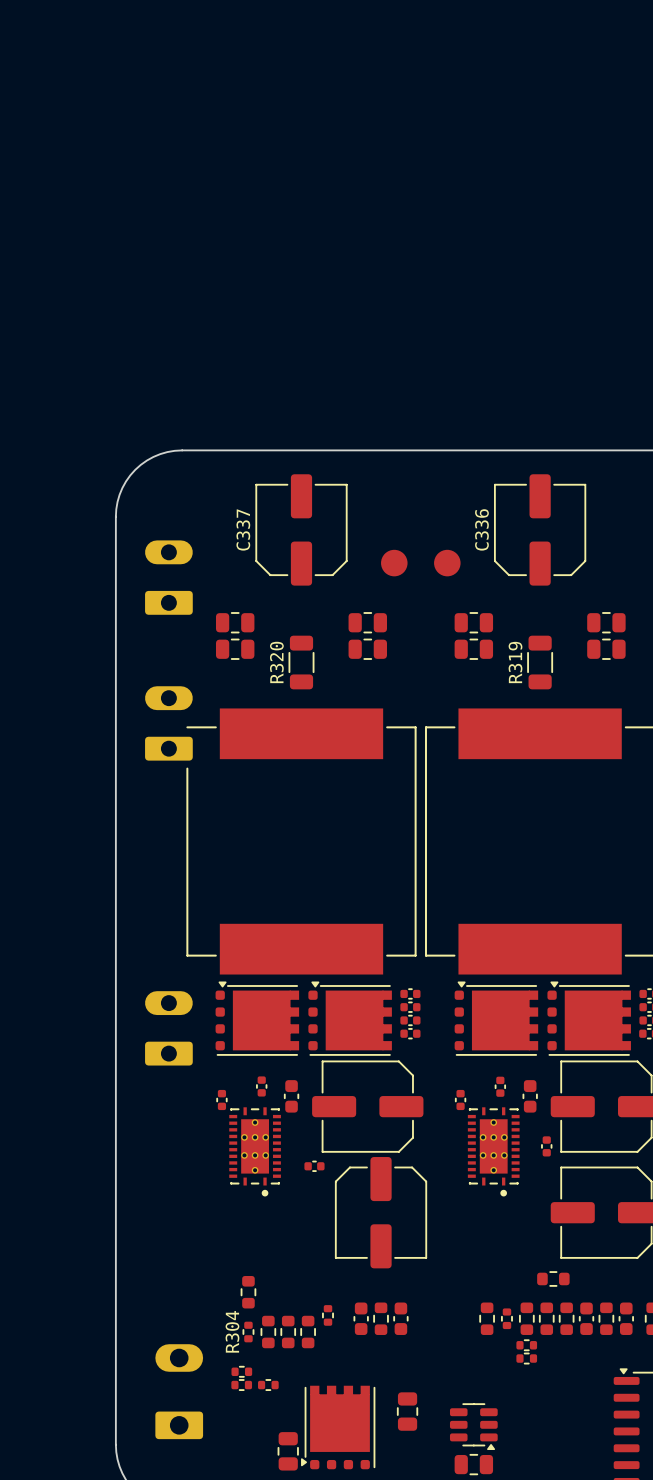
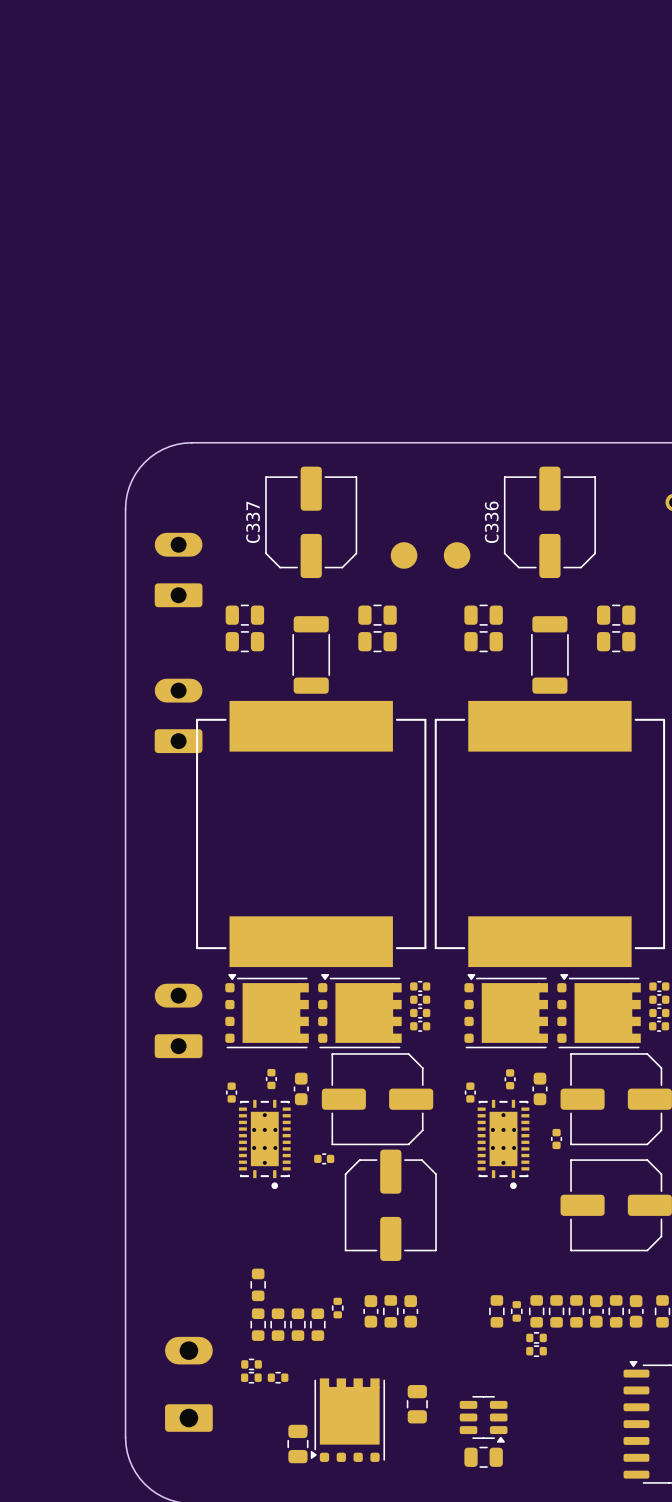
R320: (301, 662) -> none
part: none -> (311, 654)
R319: (540, 662) -> none
part: none -> (549, 654)
part footprint: [186, 708, 417, 975] -> [196, 700, 427, 968]
part rotation: 0° (553, 1278) -> 90° clockwise (258, 1324)
part position: (553, 1278) -> (258, 1324)
R304: (248, 1332) -> none

